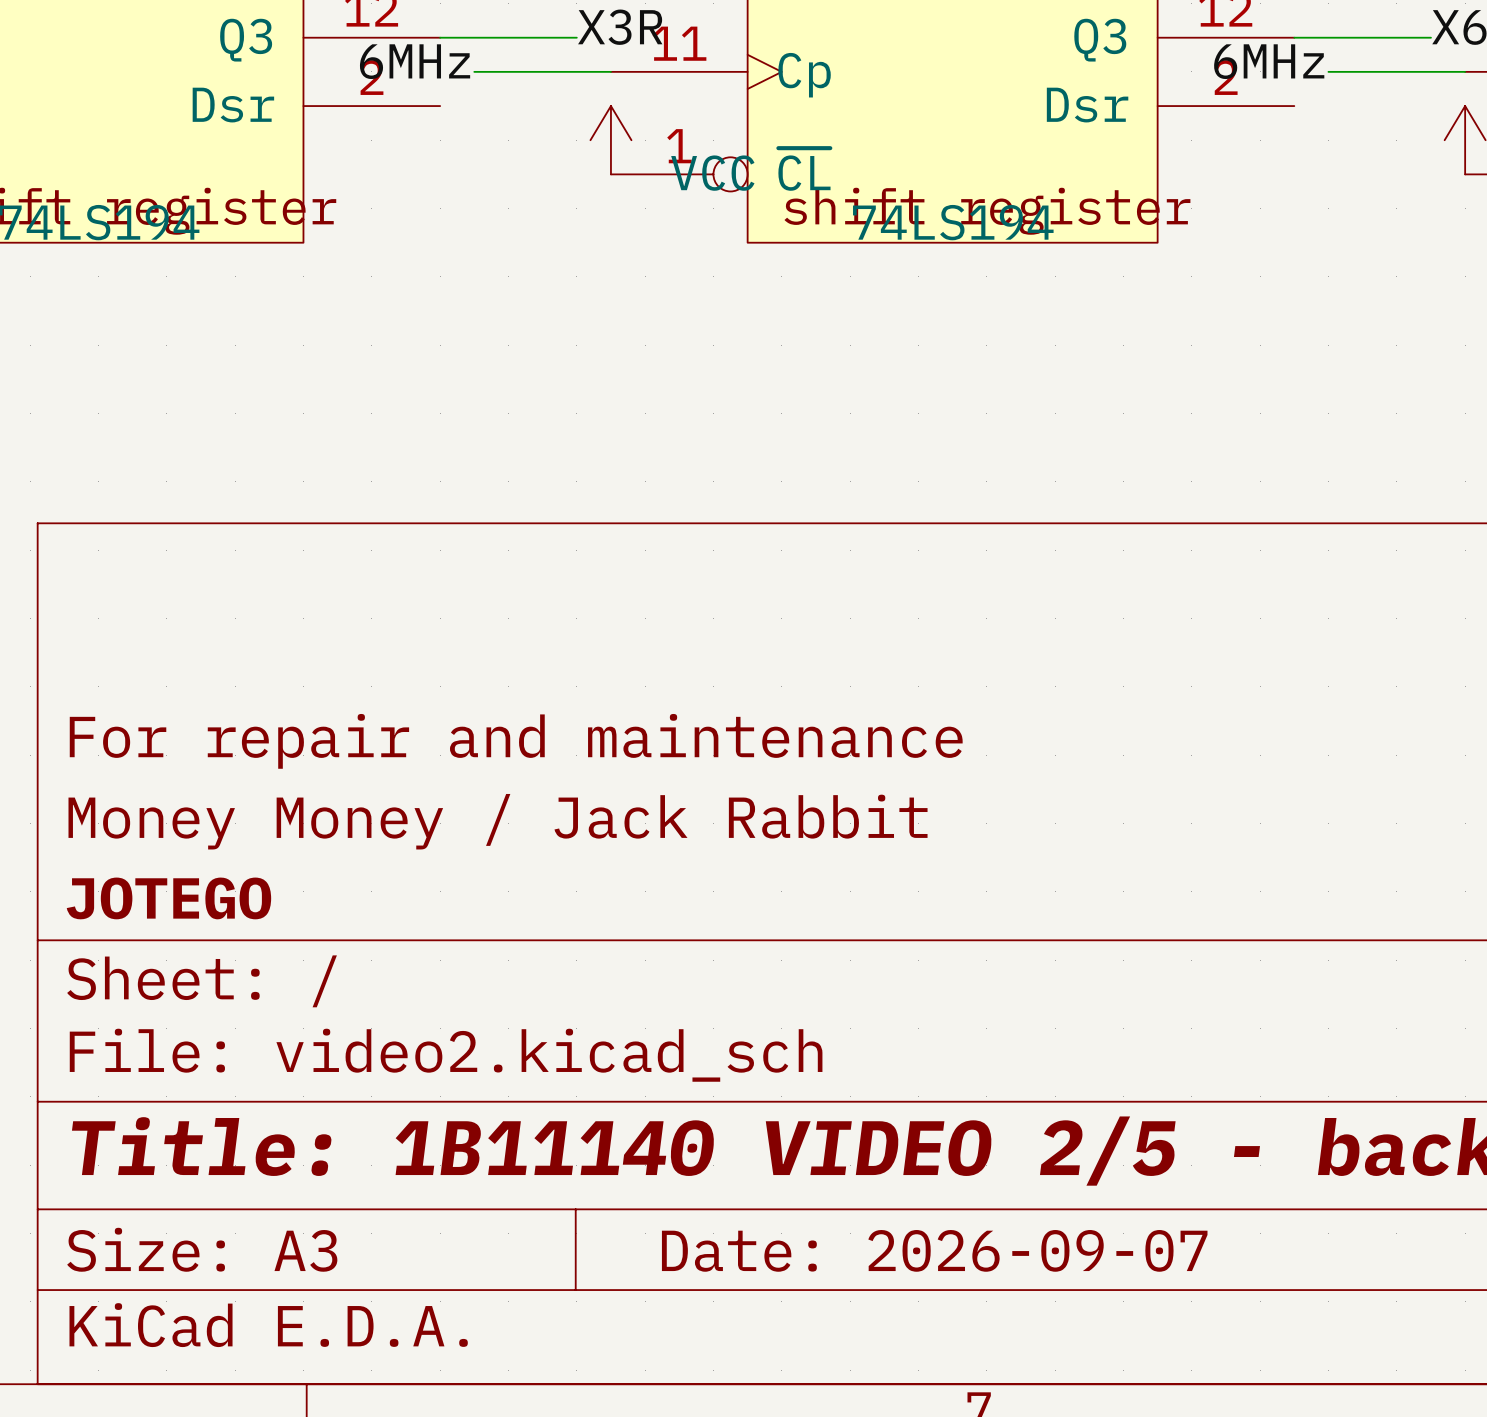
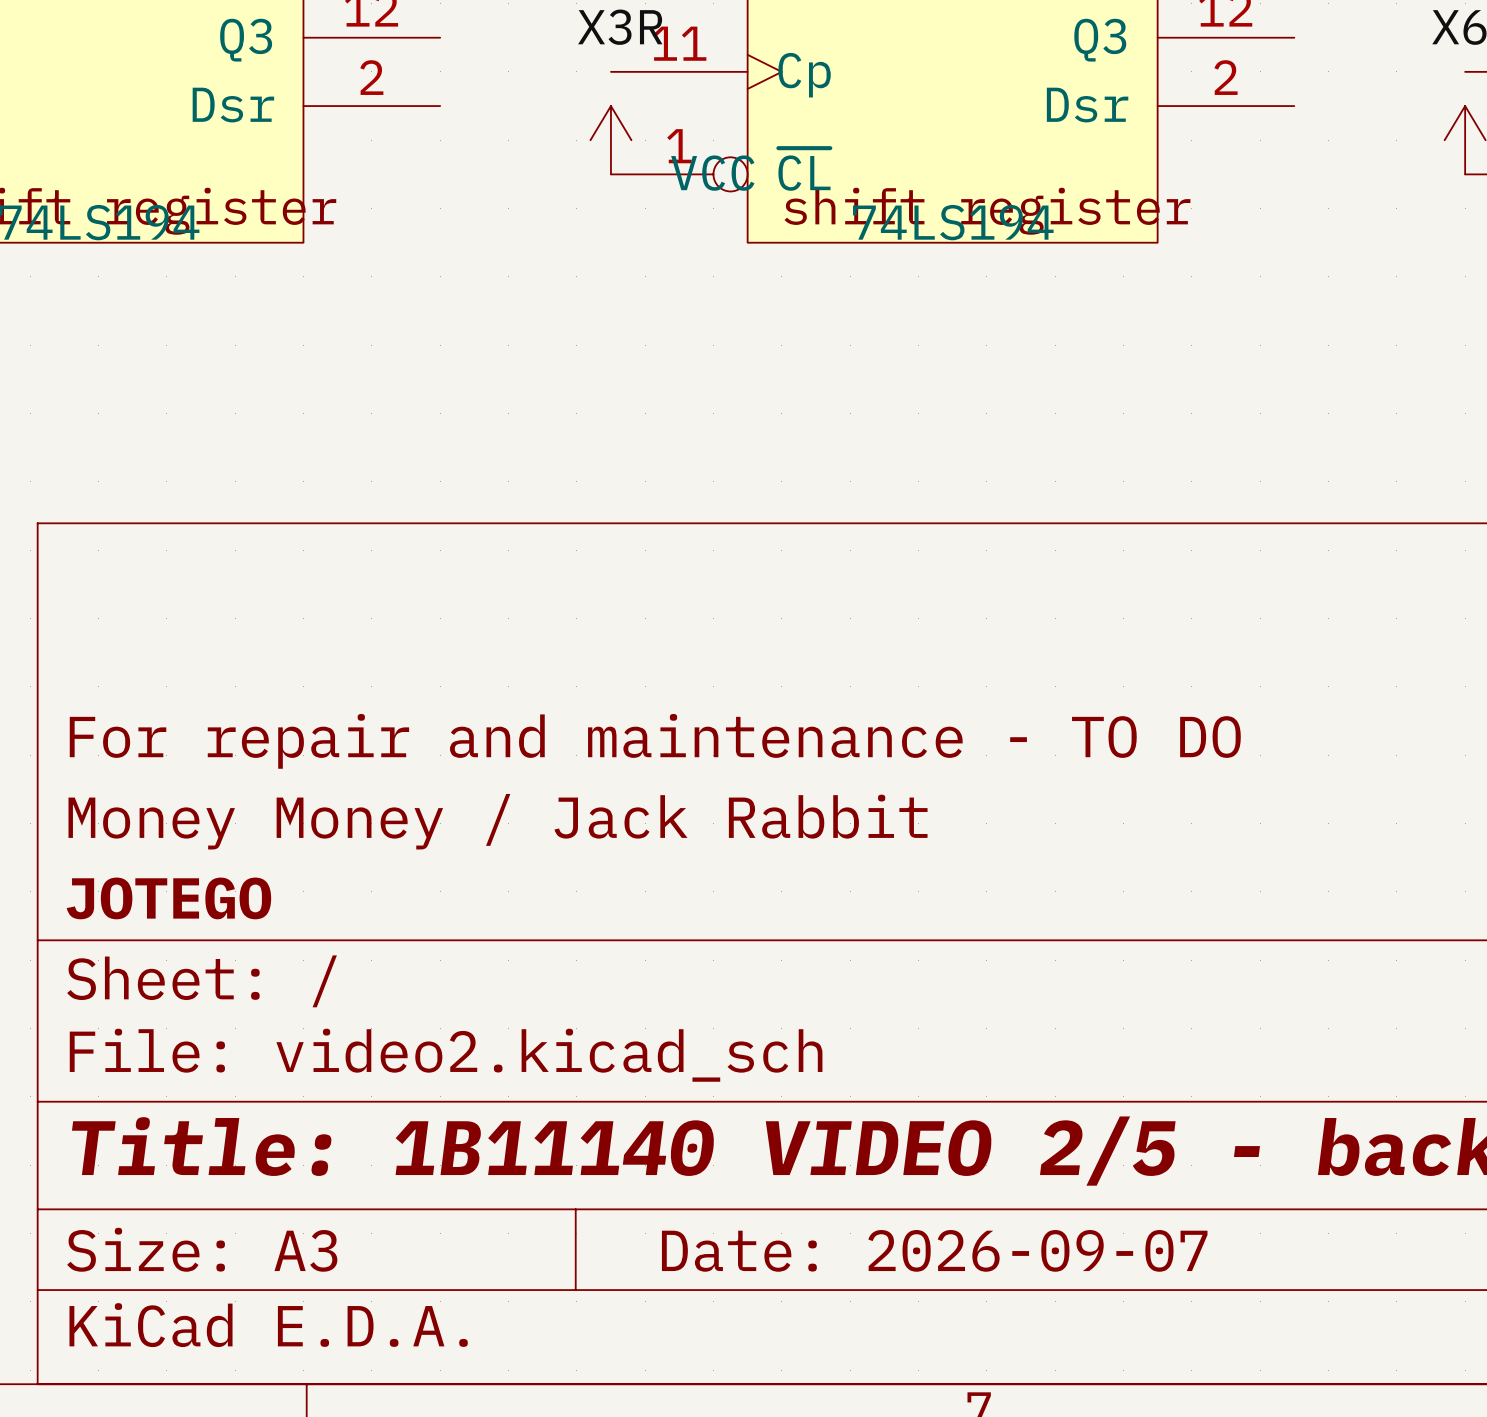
wire: (440, 37) (576, 37) -> none
wire: (1294, 37) (1430, 37) -> none
label: 6MHz (415, 61) -> none
label: 6MHz (1269, 61) -> none
wire: (474, 71) (610, 71) -> none
wire: (1328, 71) (1465, 71) -> none
title block: For repair and maintenance (516, 741) -> For repair and maintenance - TO DO (655, 741)

